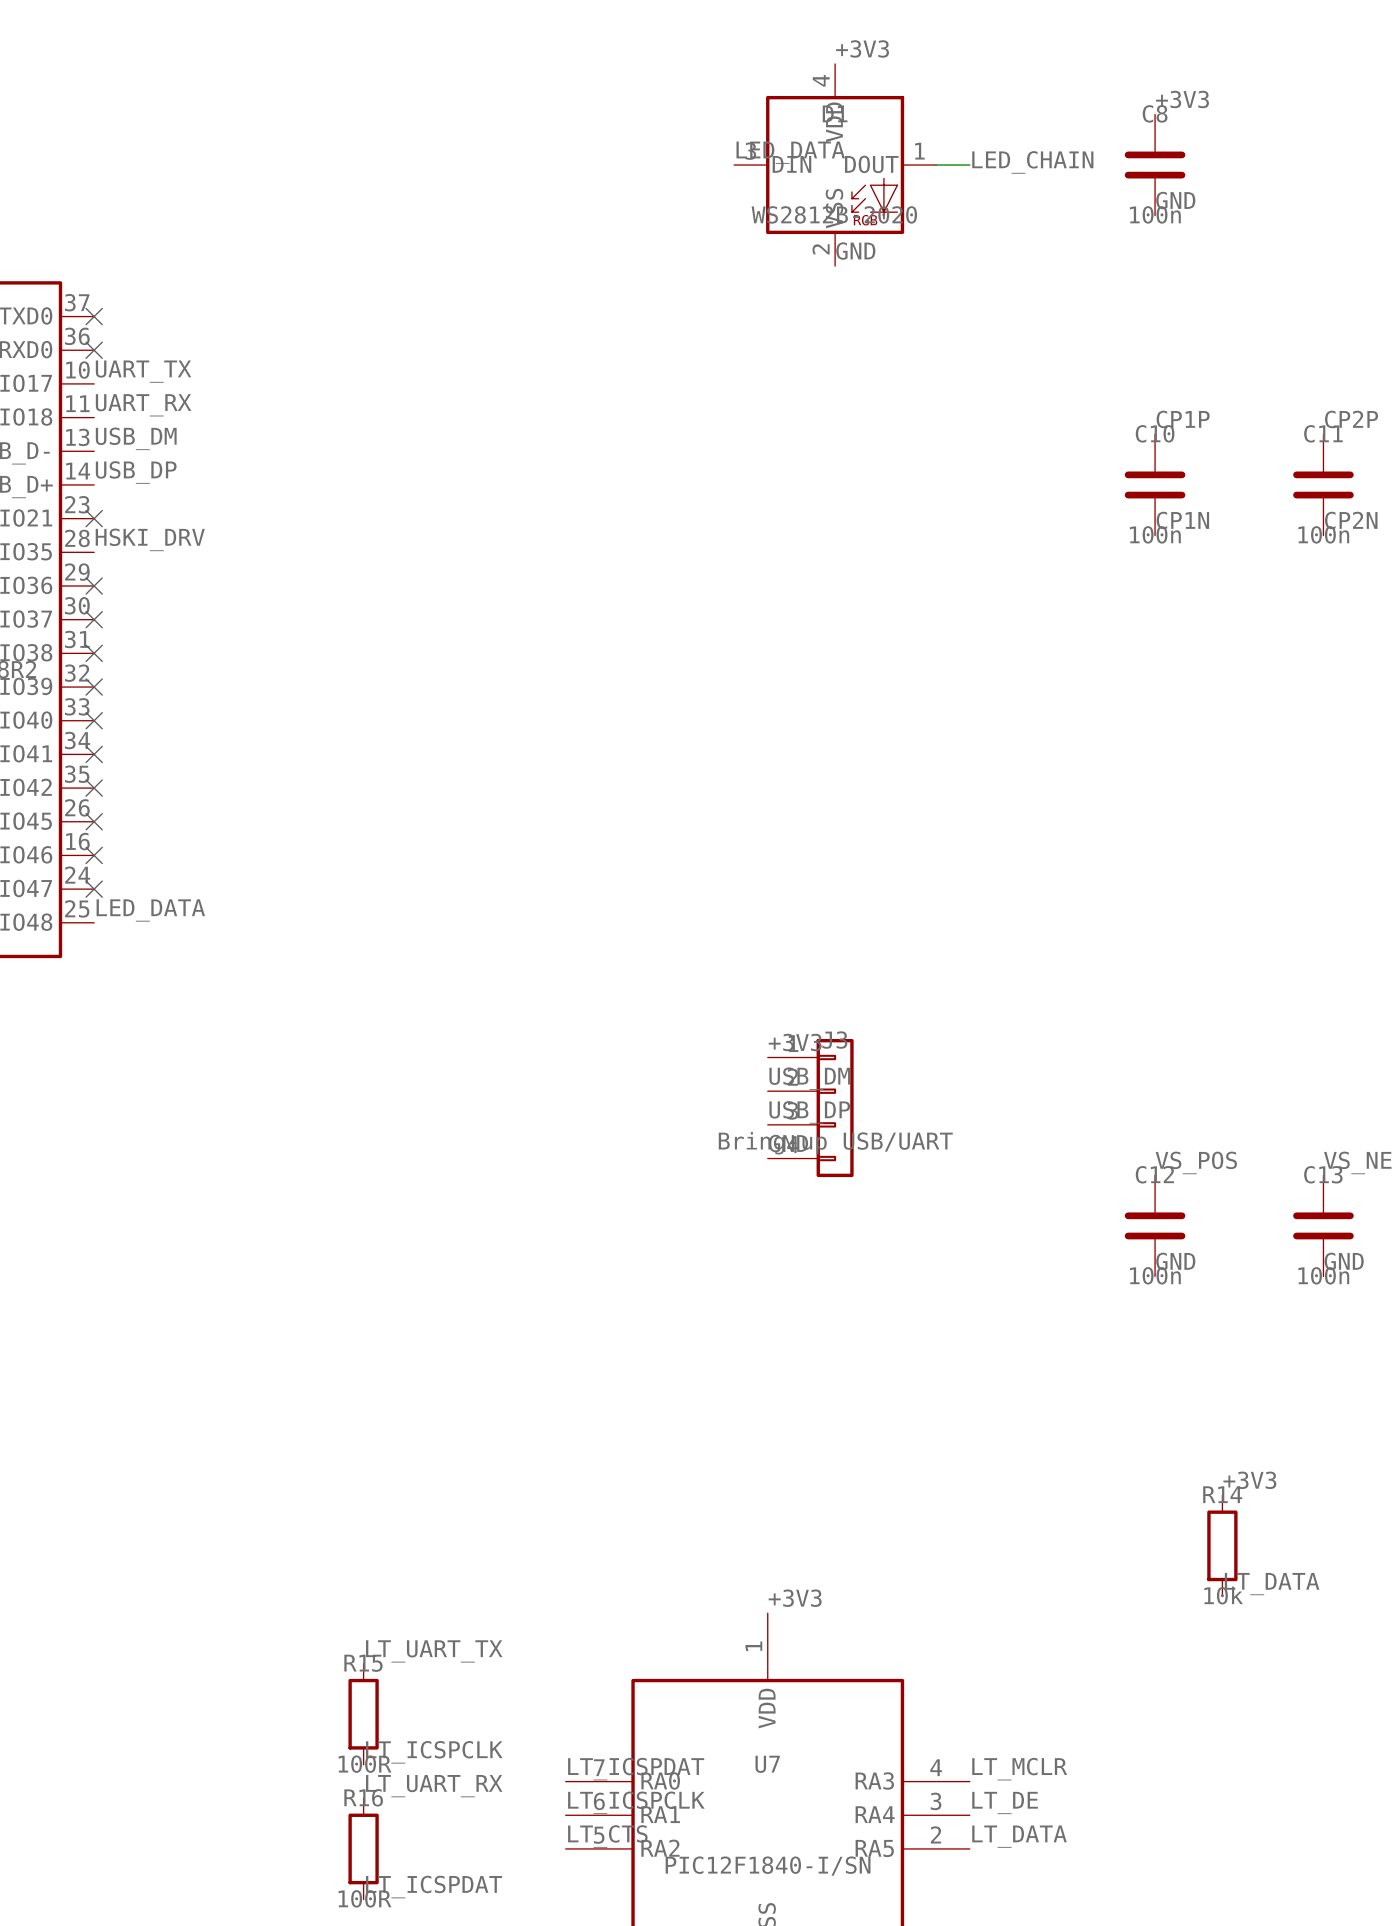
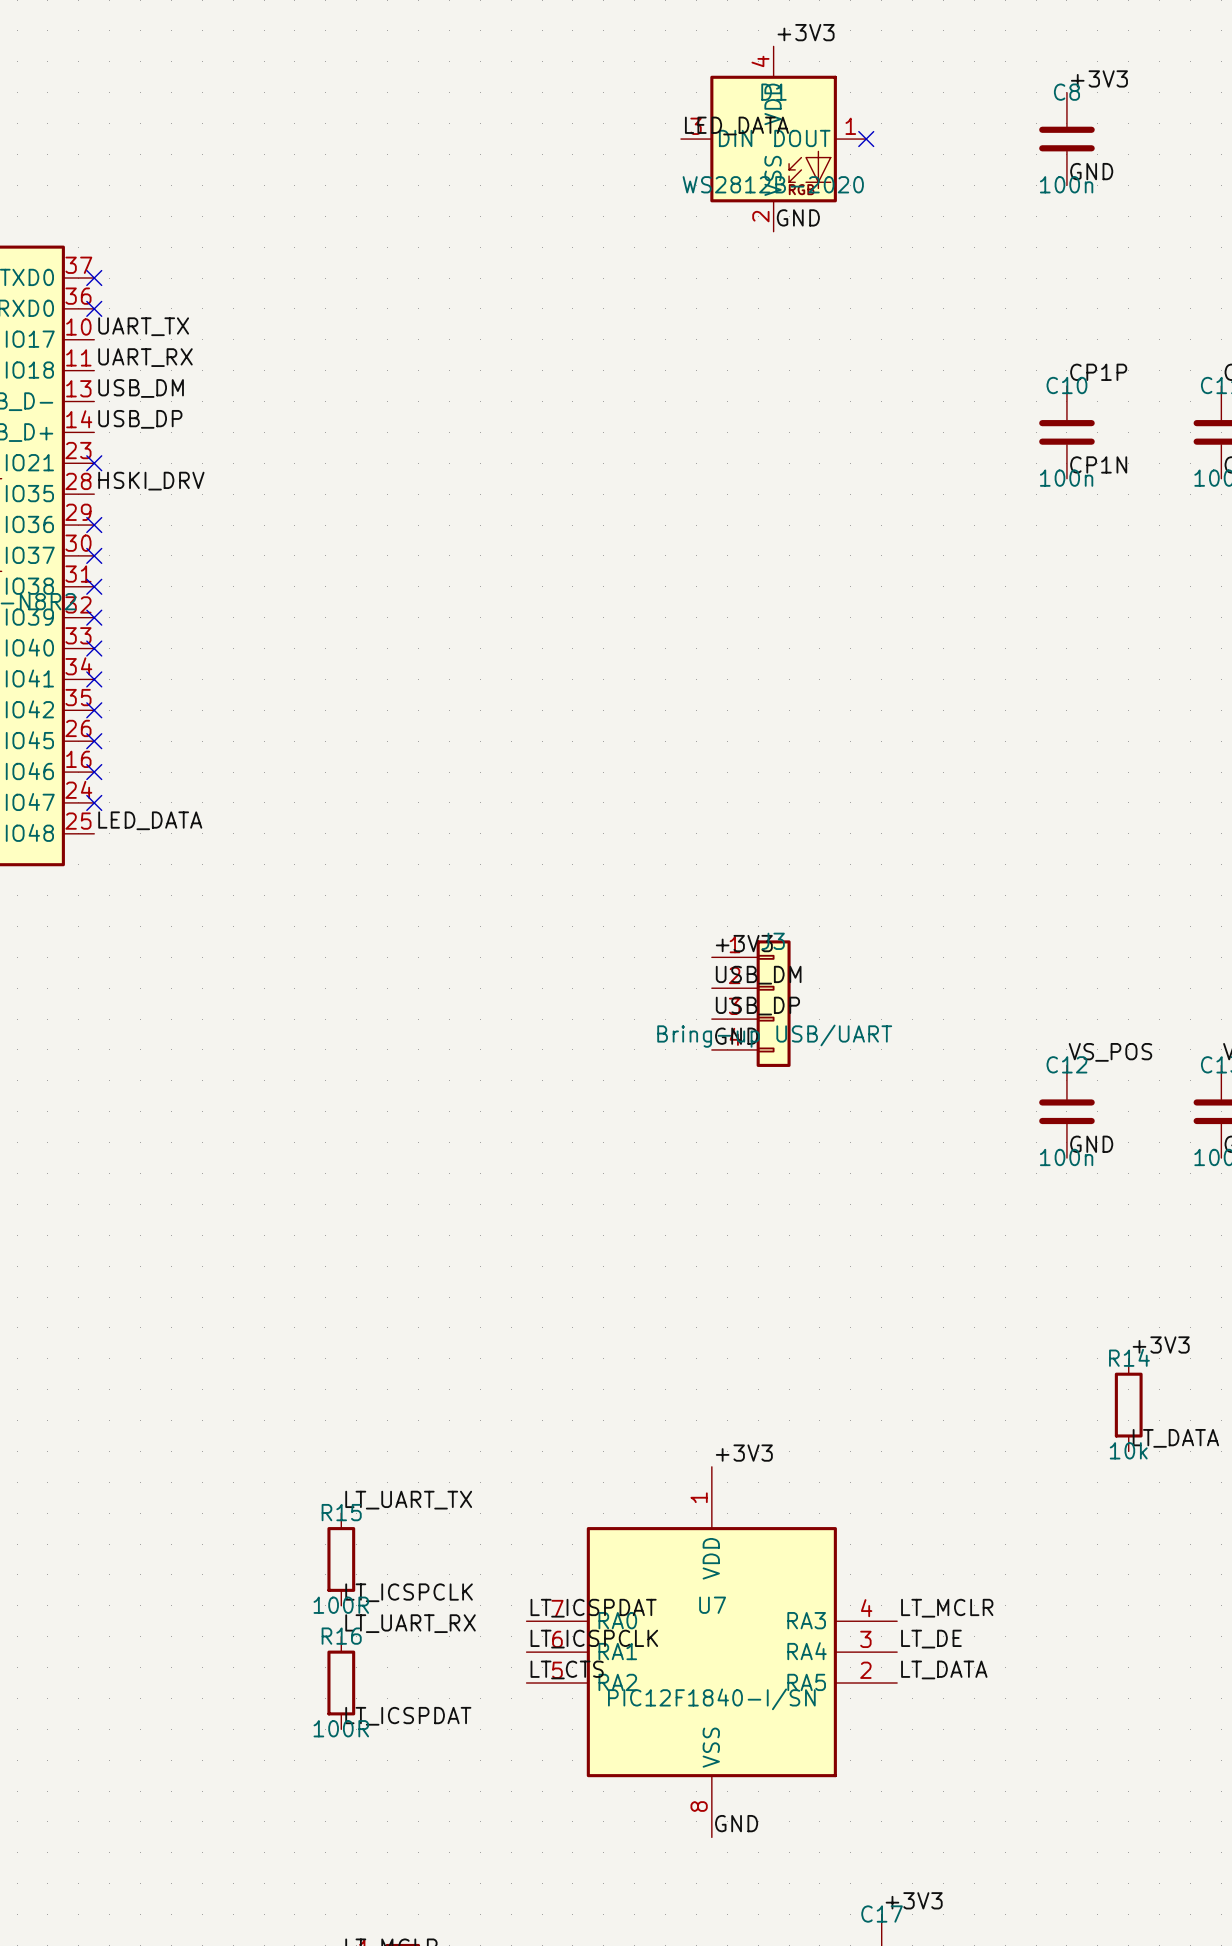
label: LED_CHAIN (1032, 162) -> none
wire: (936, 165) (969, 165) -> none
no-connect mark: none -> (866, 139)

